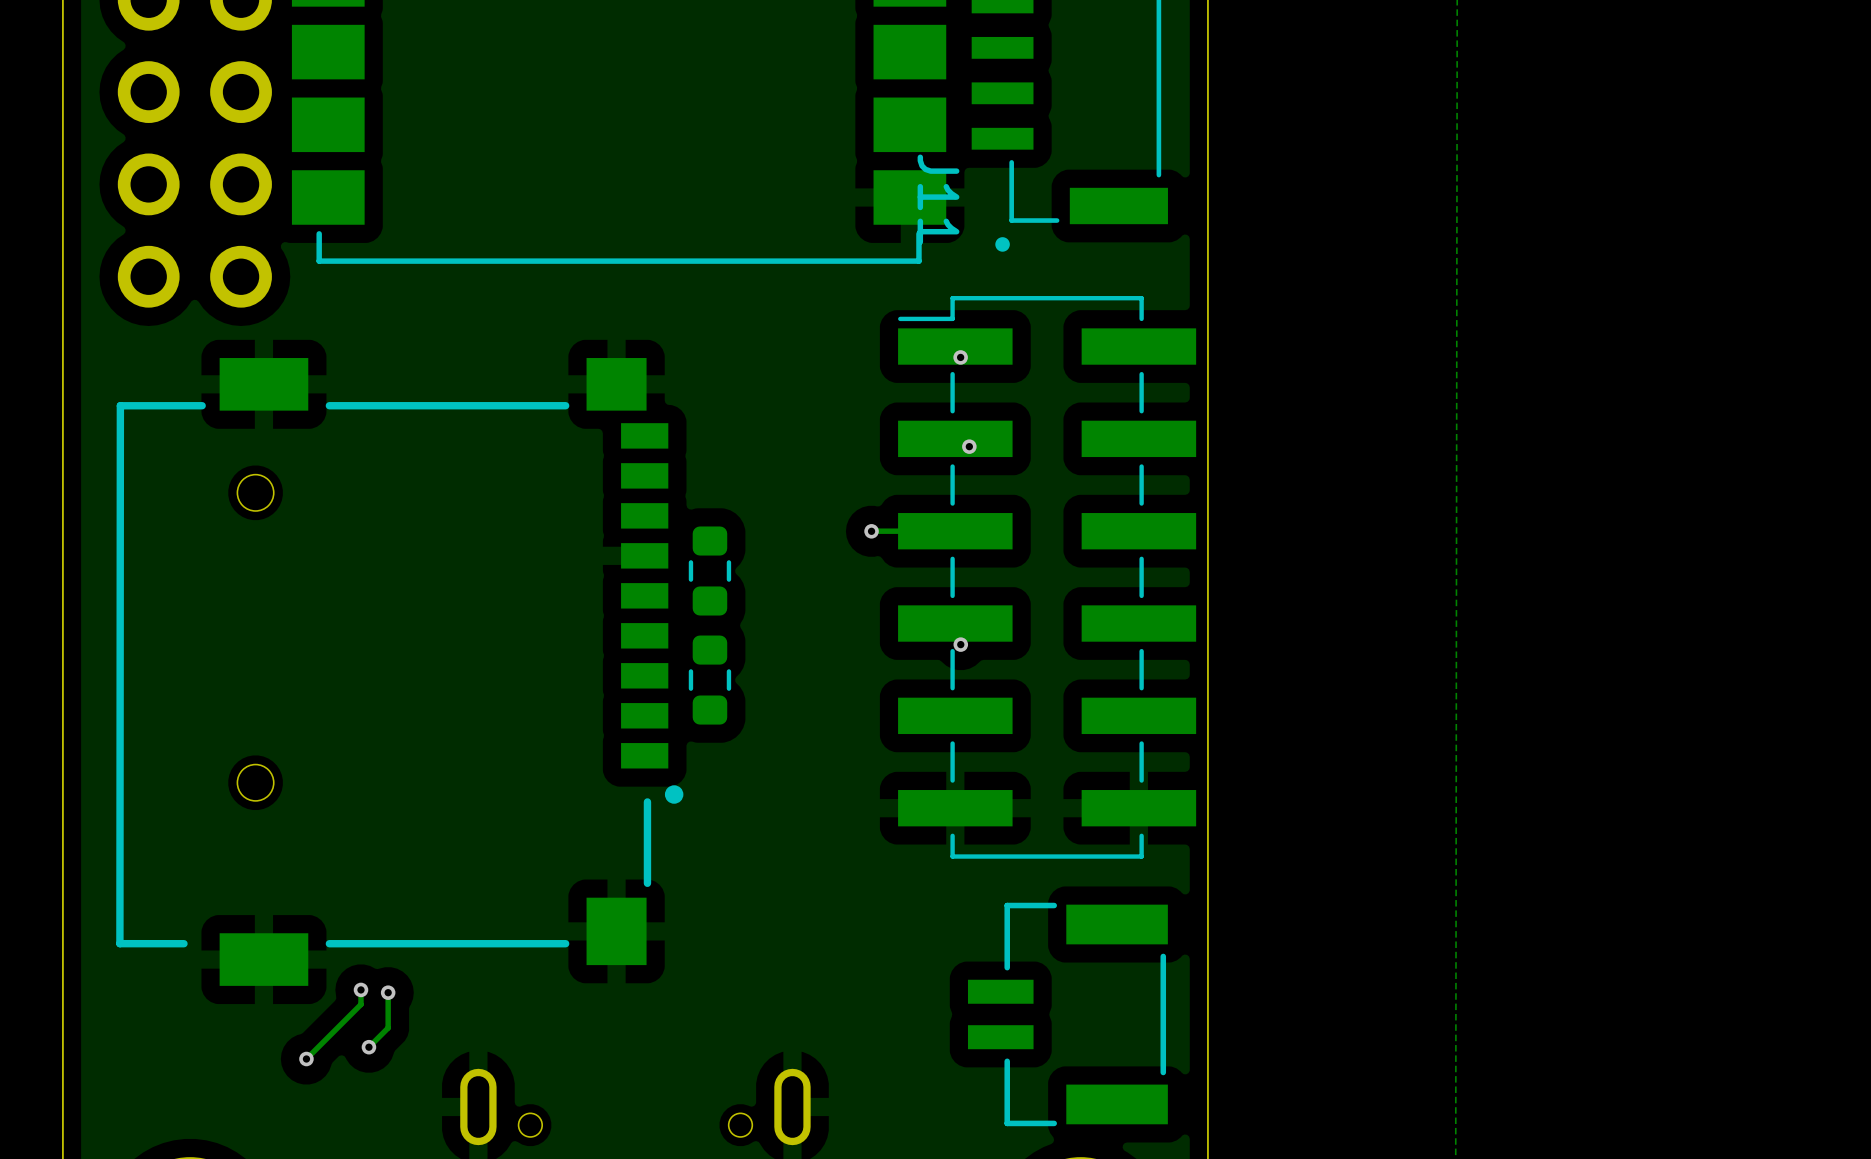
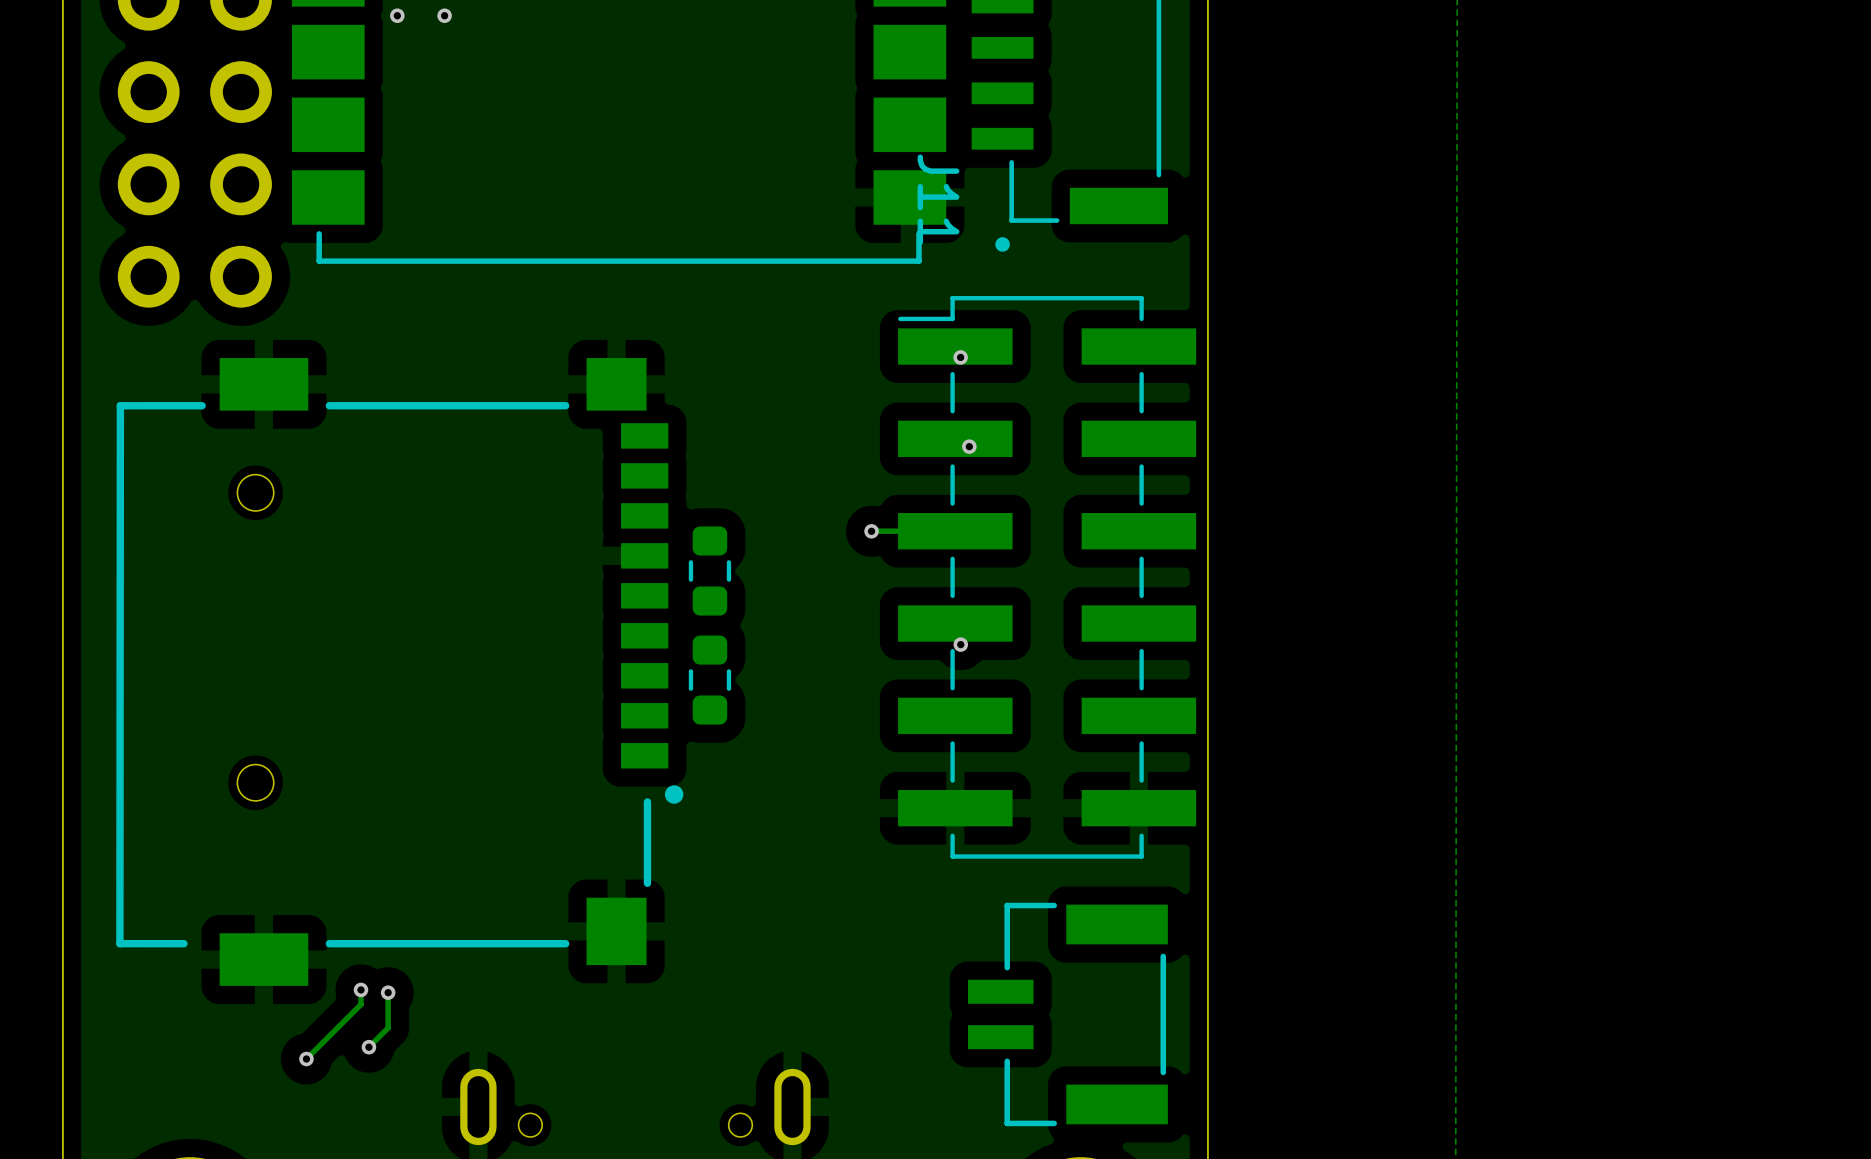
via: none -> (397, 15)
via: none -> (444, 15)

